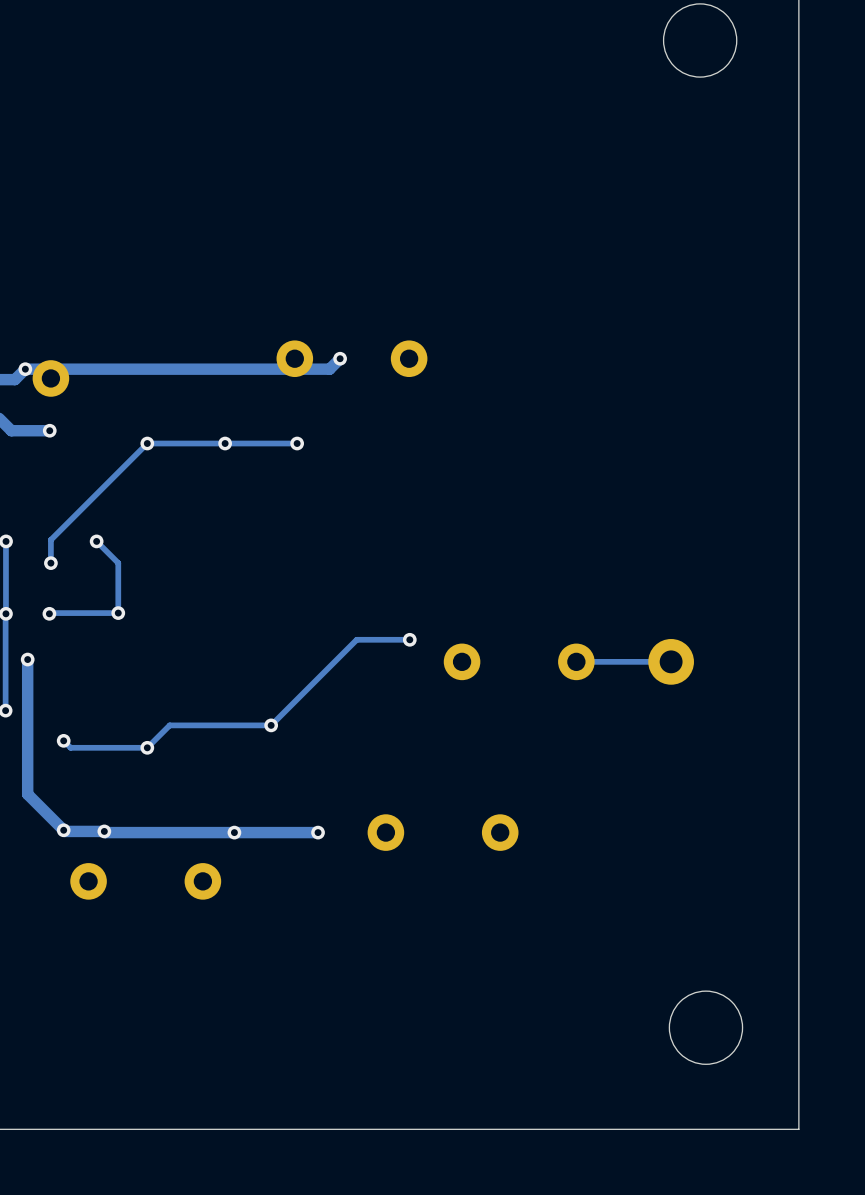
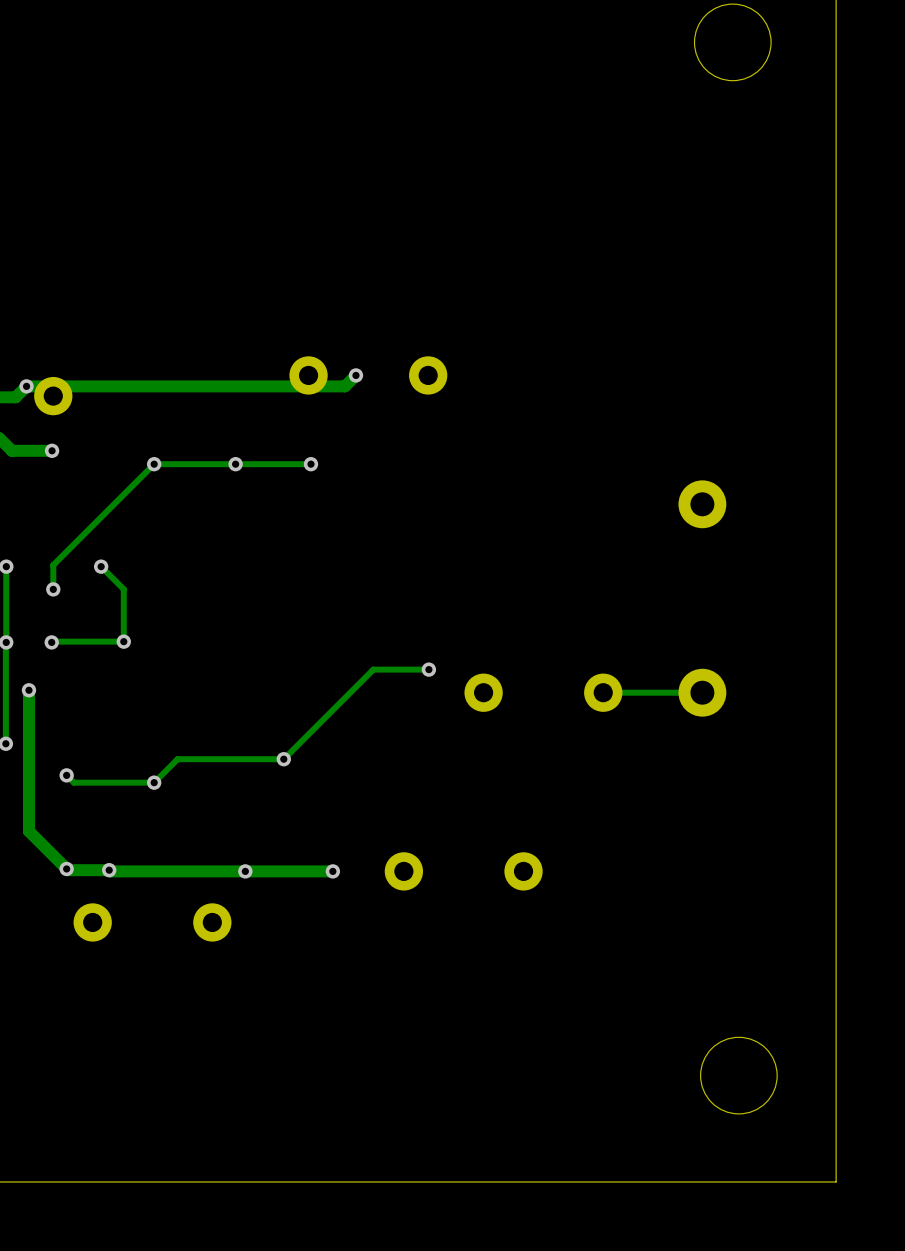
part: none -> (702, 504)

